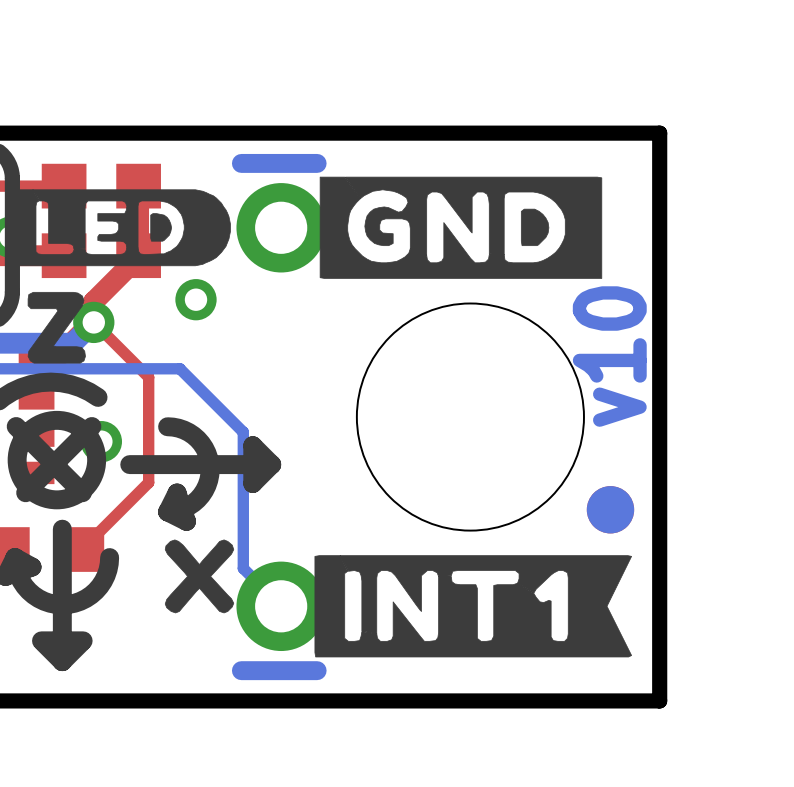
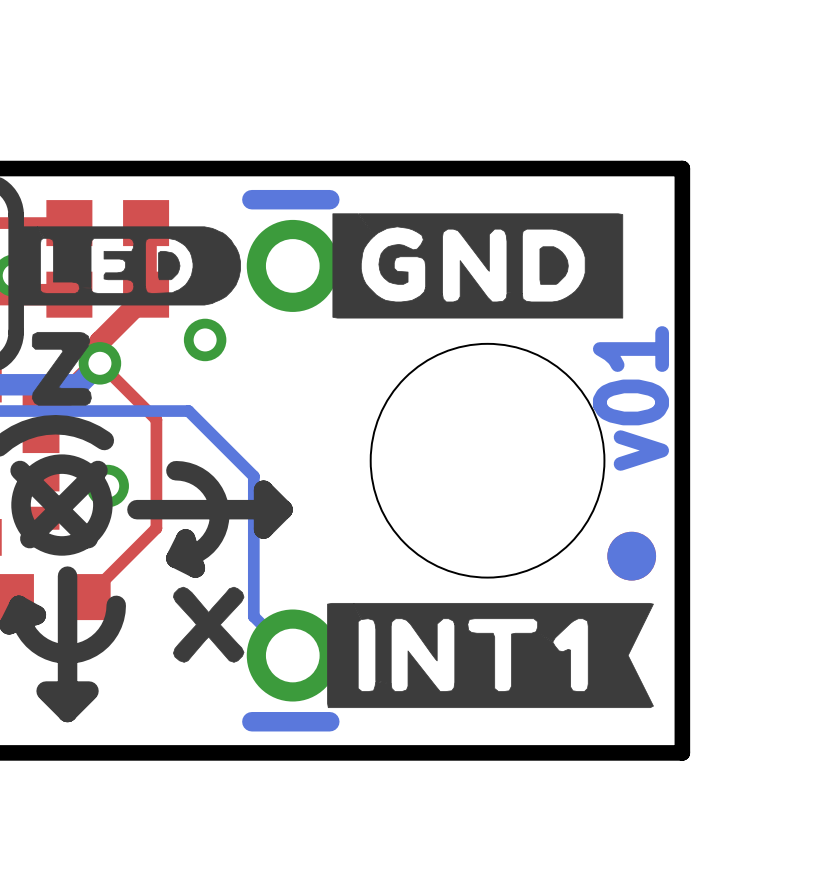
text: v10 (609, 356) -> v01 (630, 398)

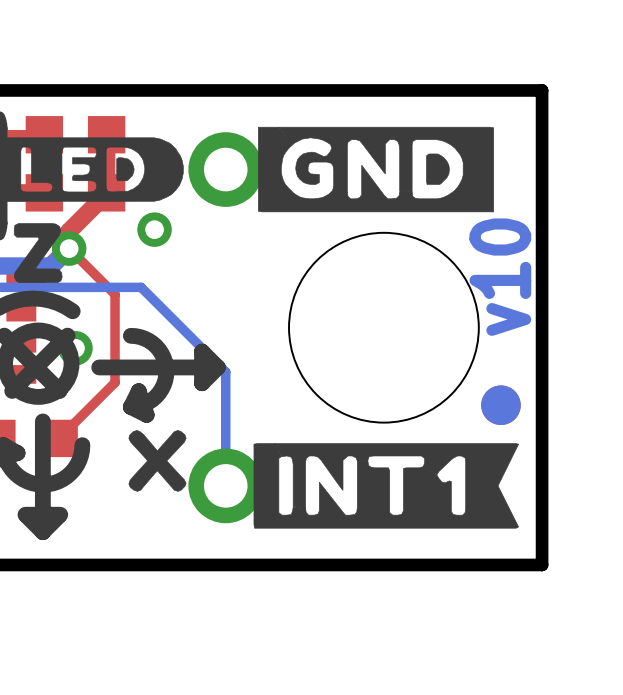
bottom track: (329, 199) (251, 199) -> none
text: v01 (630, 398) -> v10 (500, 277)
bottom track: (253, 476) (253, 616) (292, 655) -> (194, 340) (225, 371) (225, 485)
bottom track: (329, 721) (251, 721) -> none

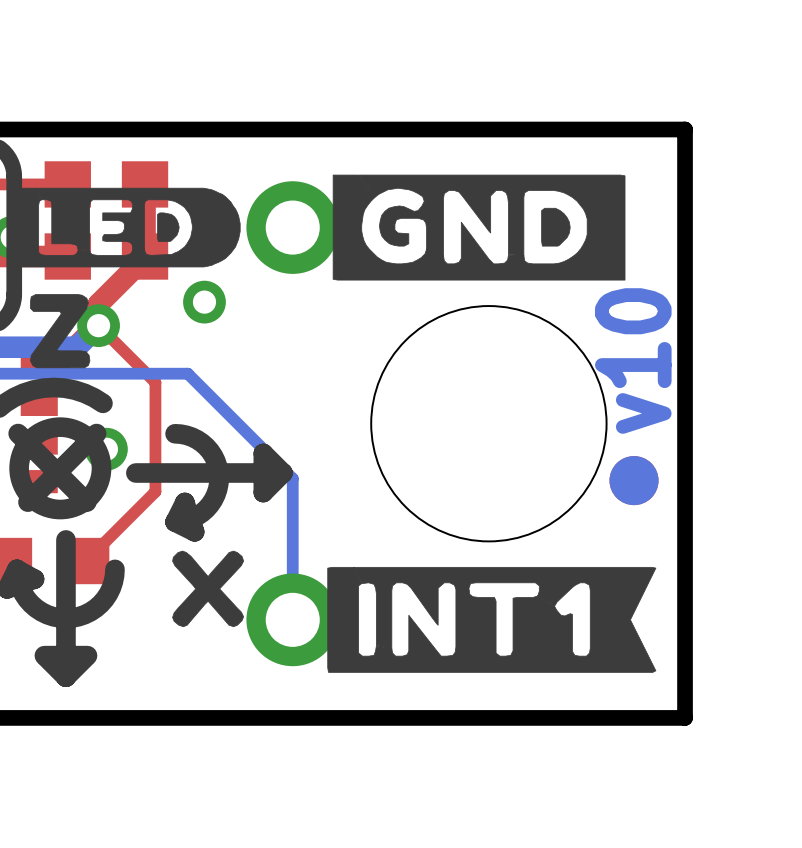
part position: (500, 405) -> (634, 480)

